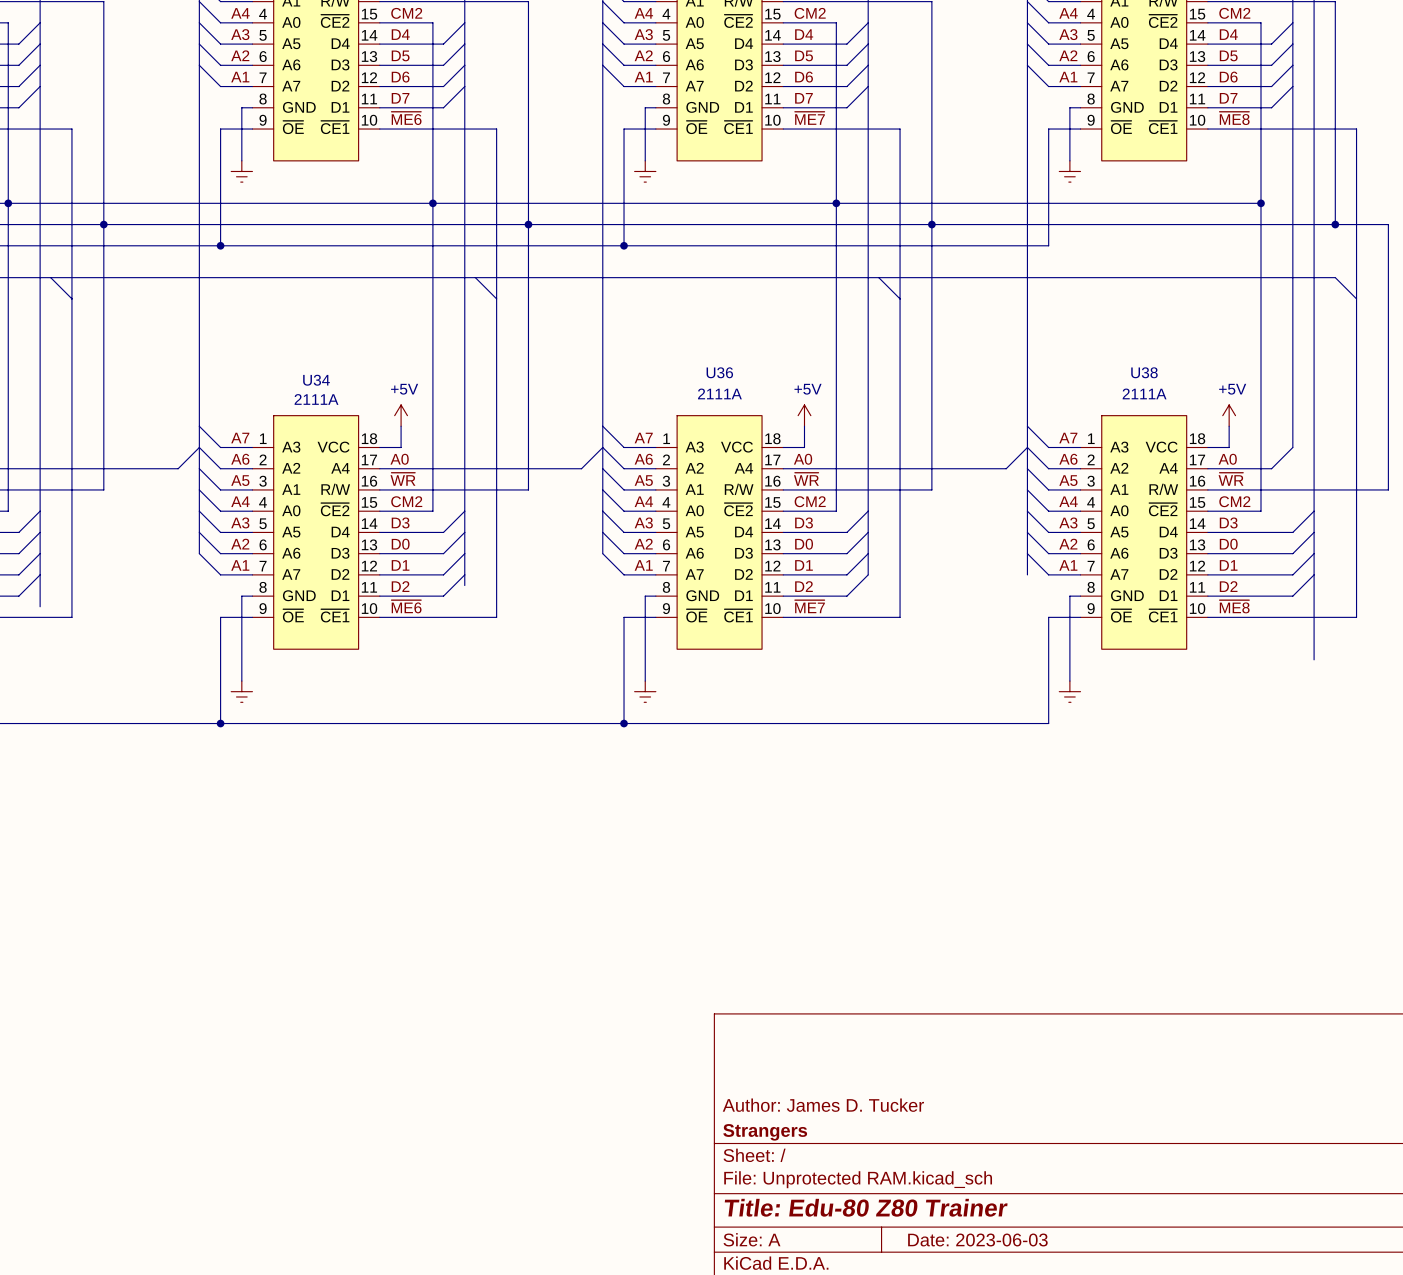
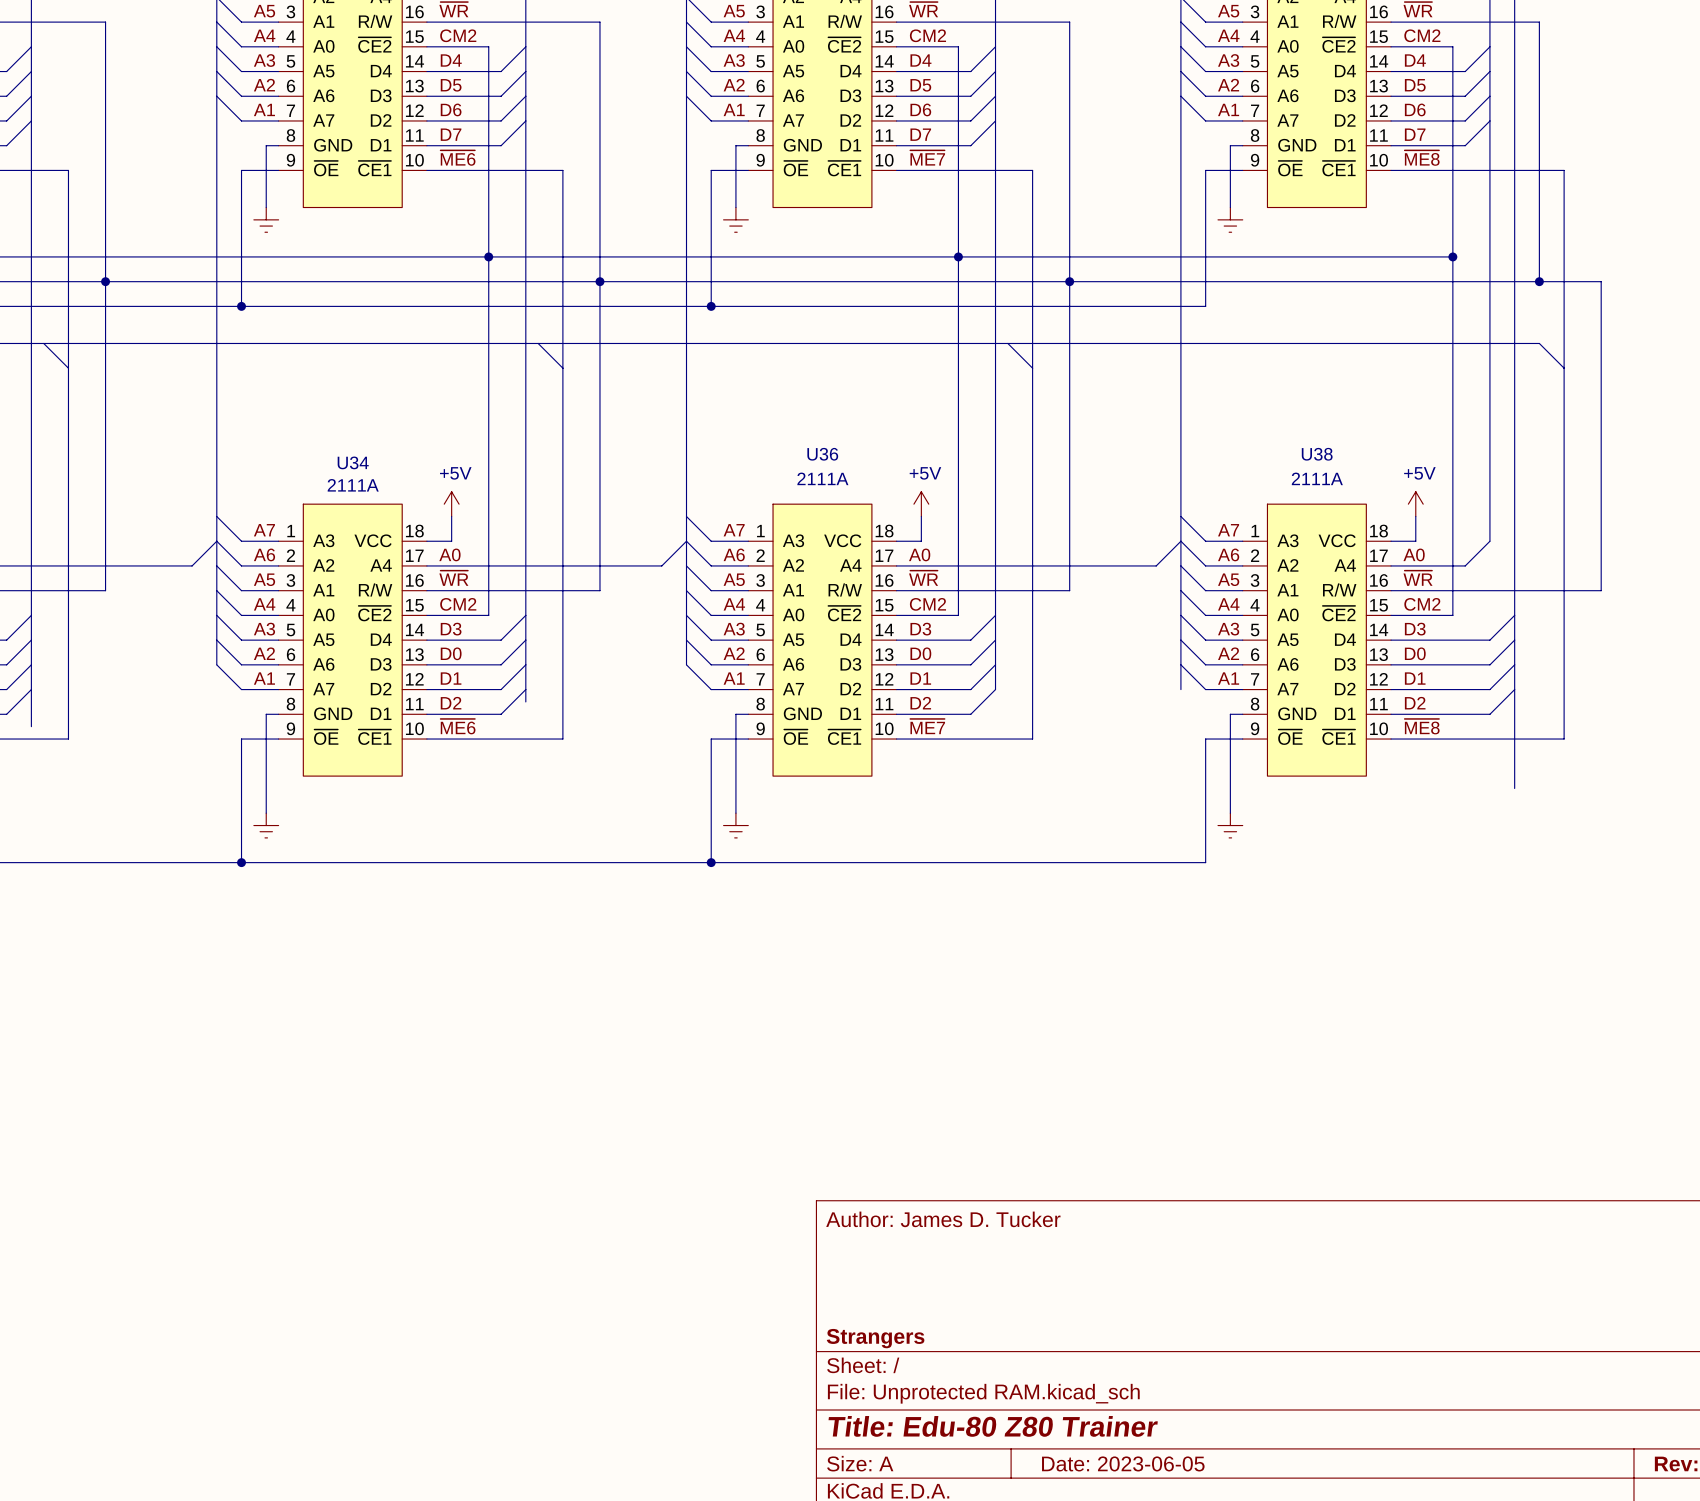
title block position: Author: James D. Tucker (823, 1105) -> Author: James D. Tucker (943, 1219)
title block: Date: 2023-06-03 (977, 1239) -> Date: 2023-06-05 (1123, 1463)

